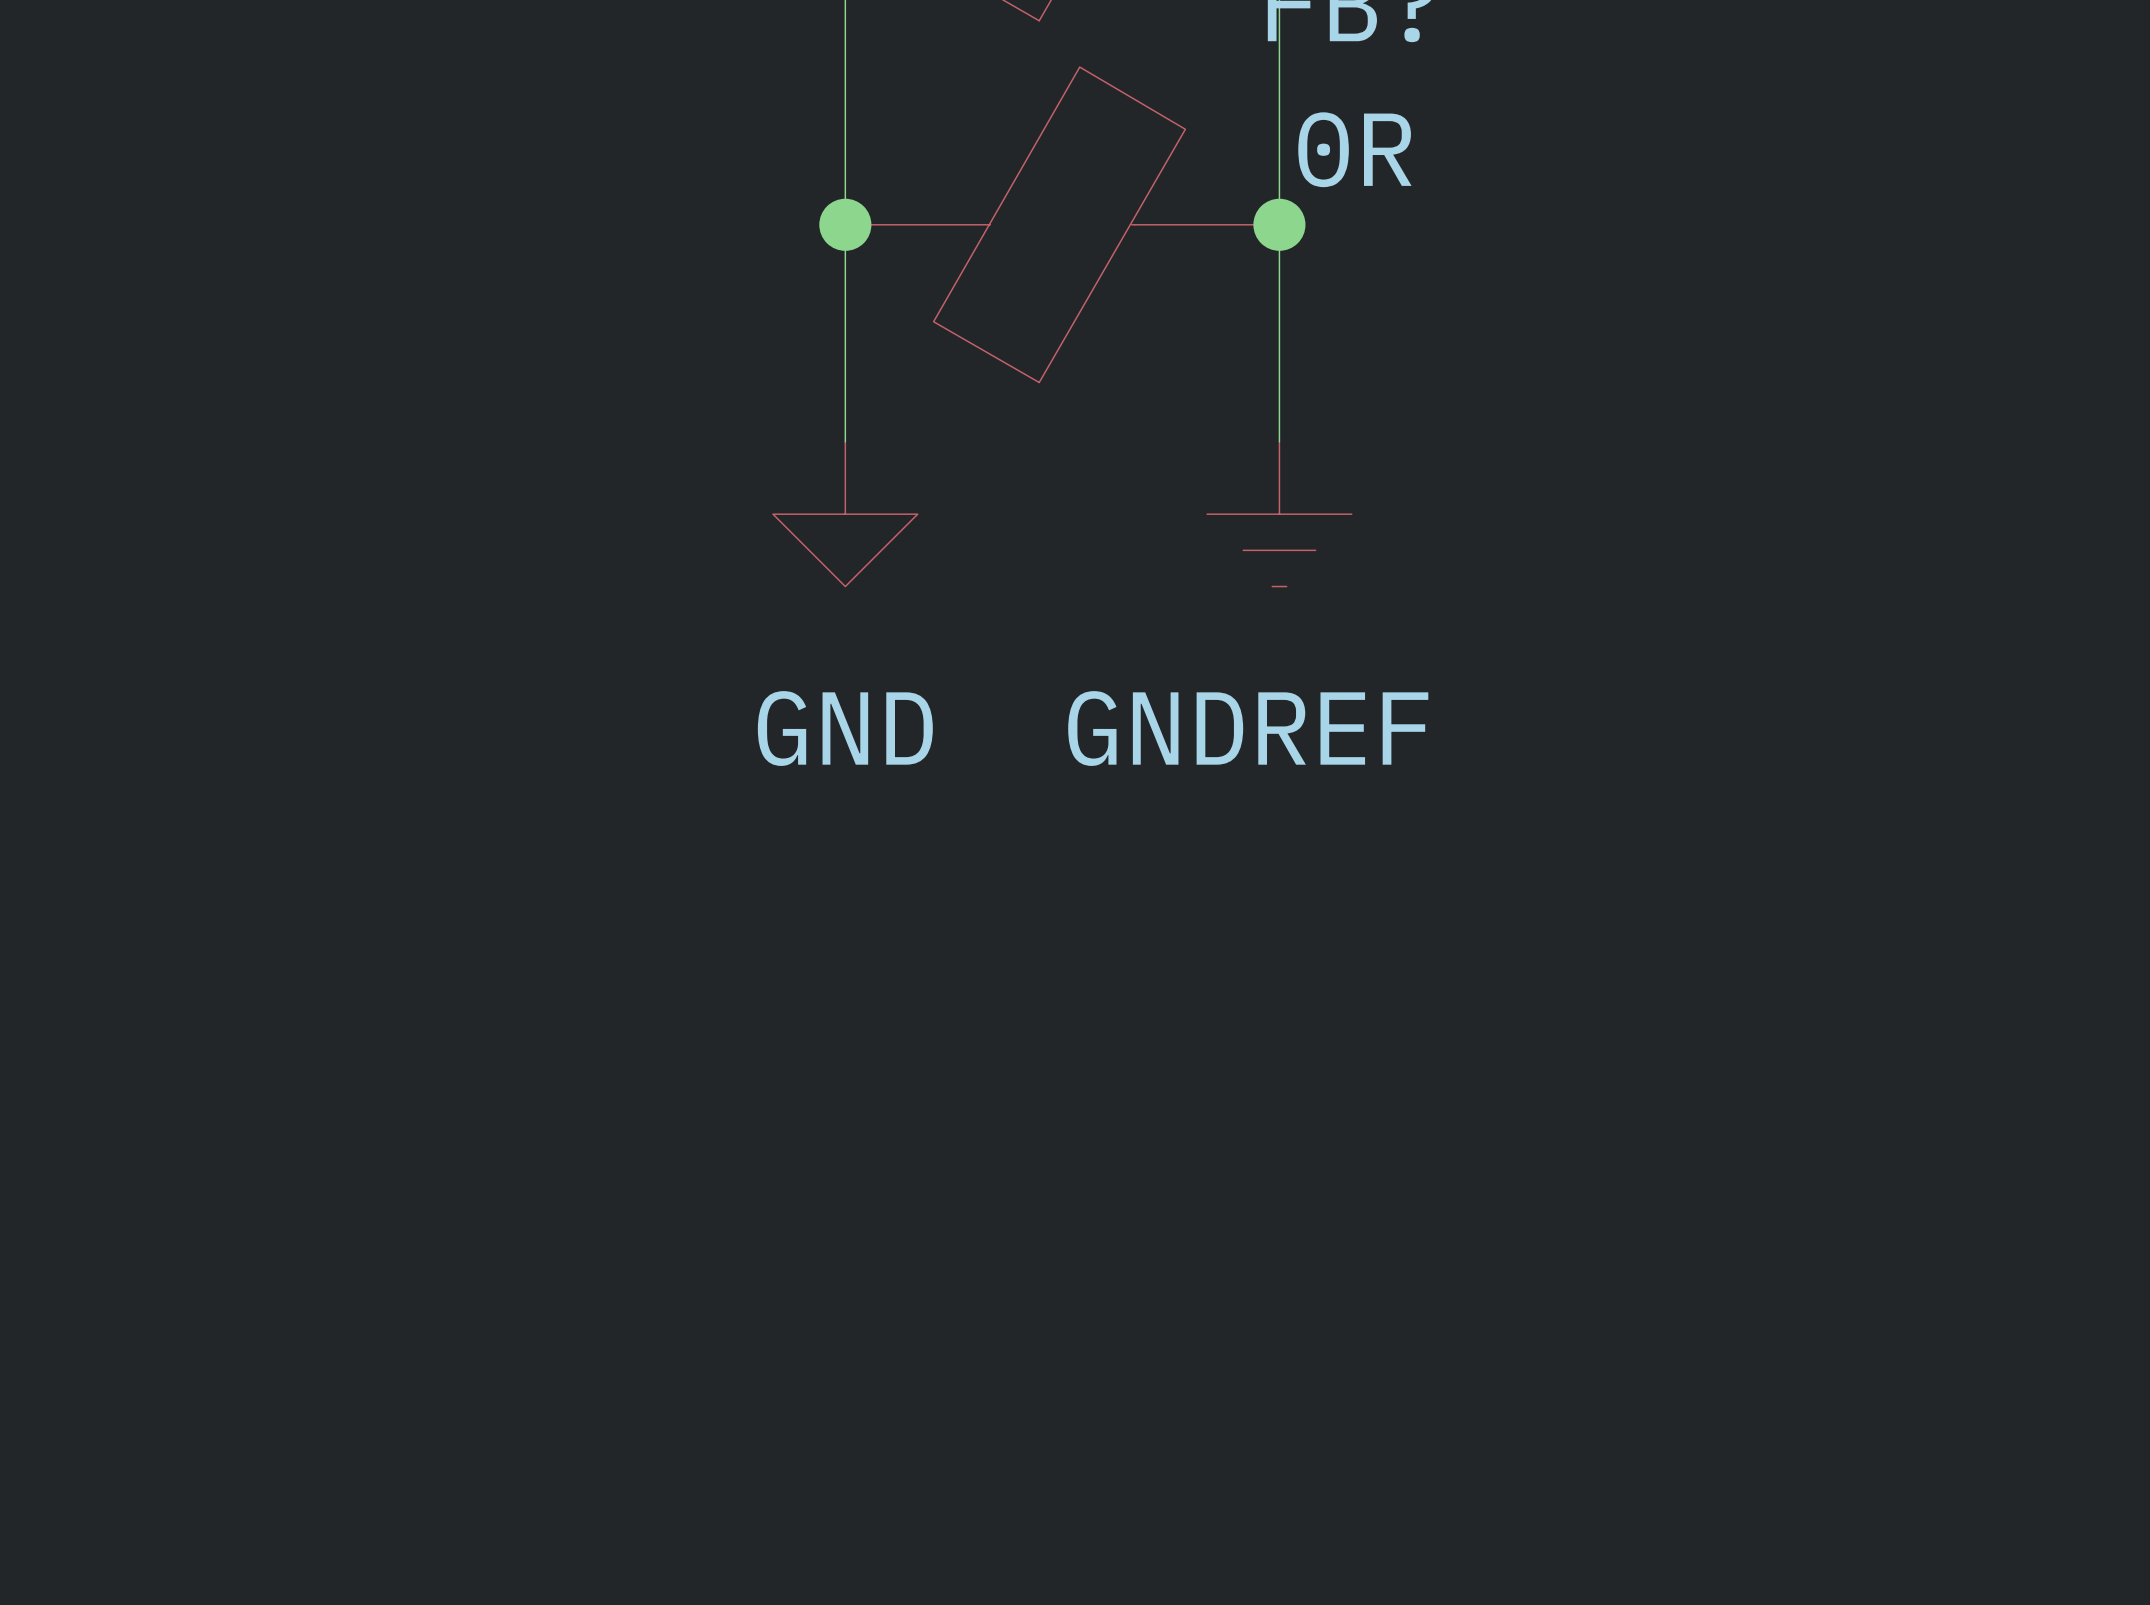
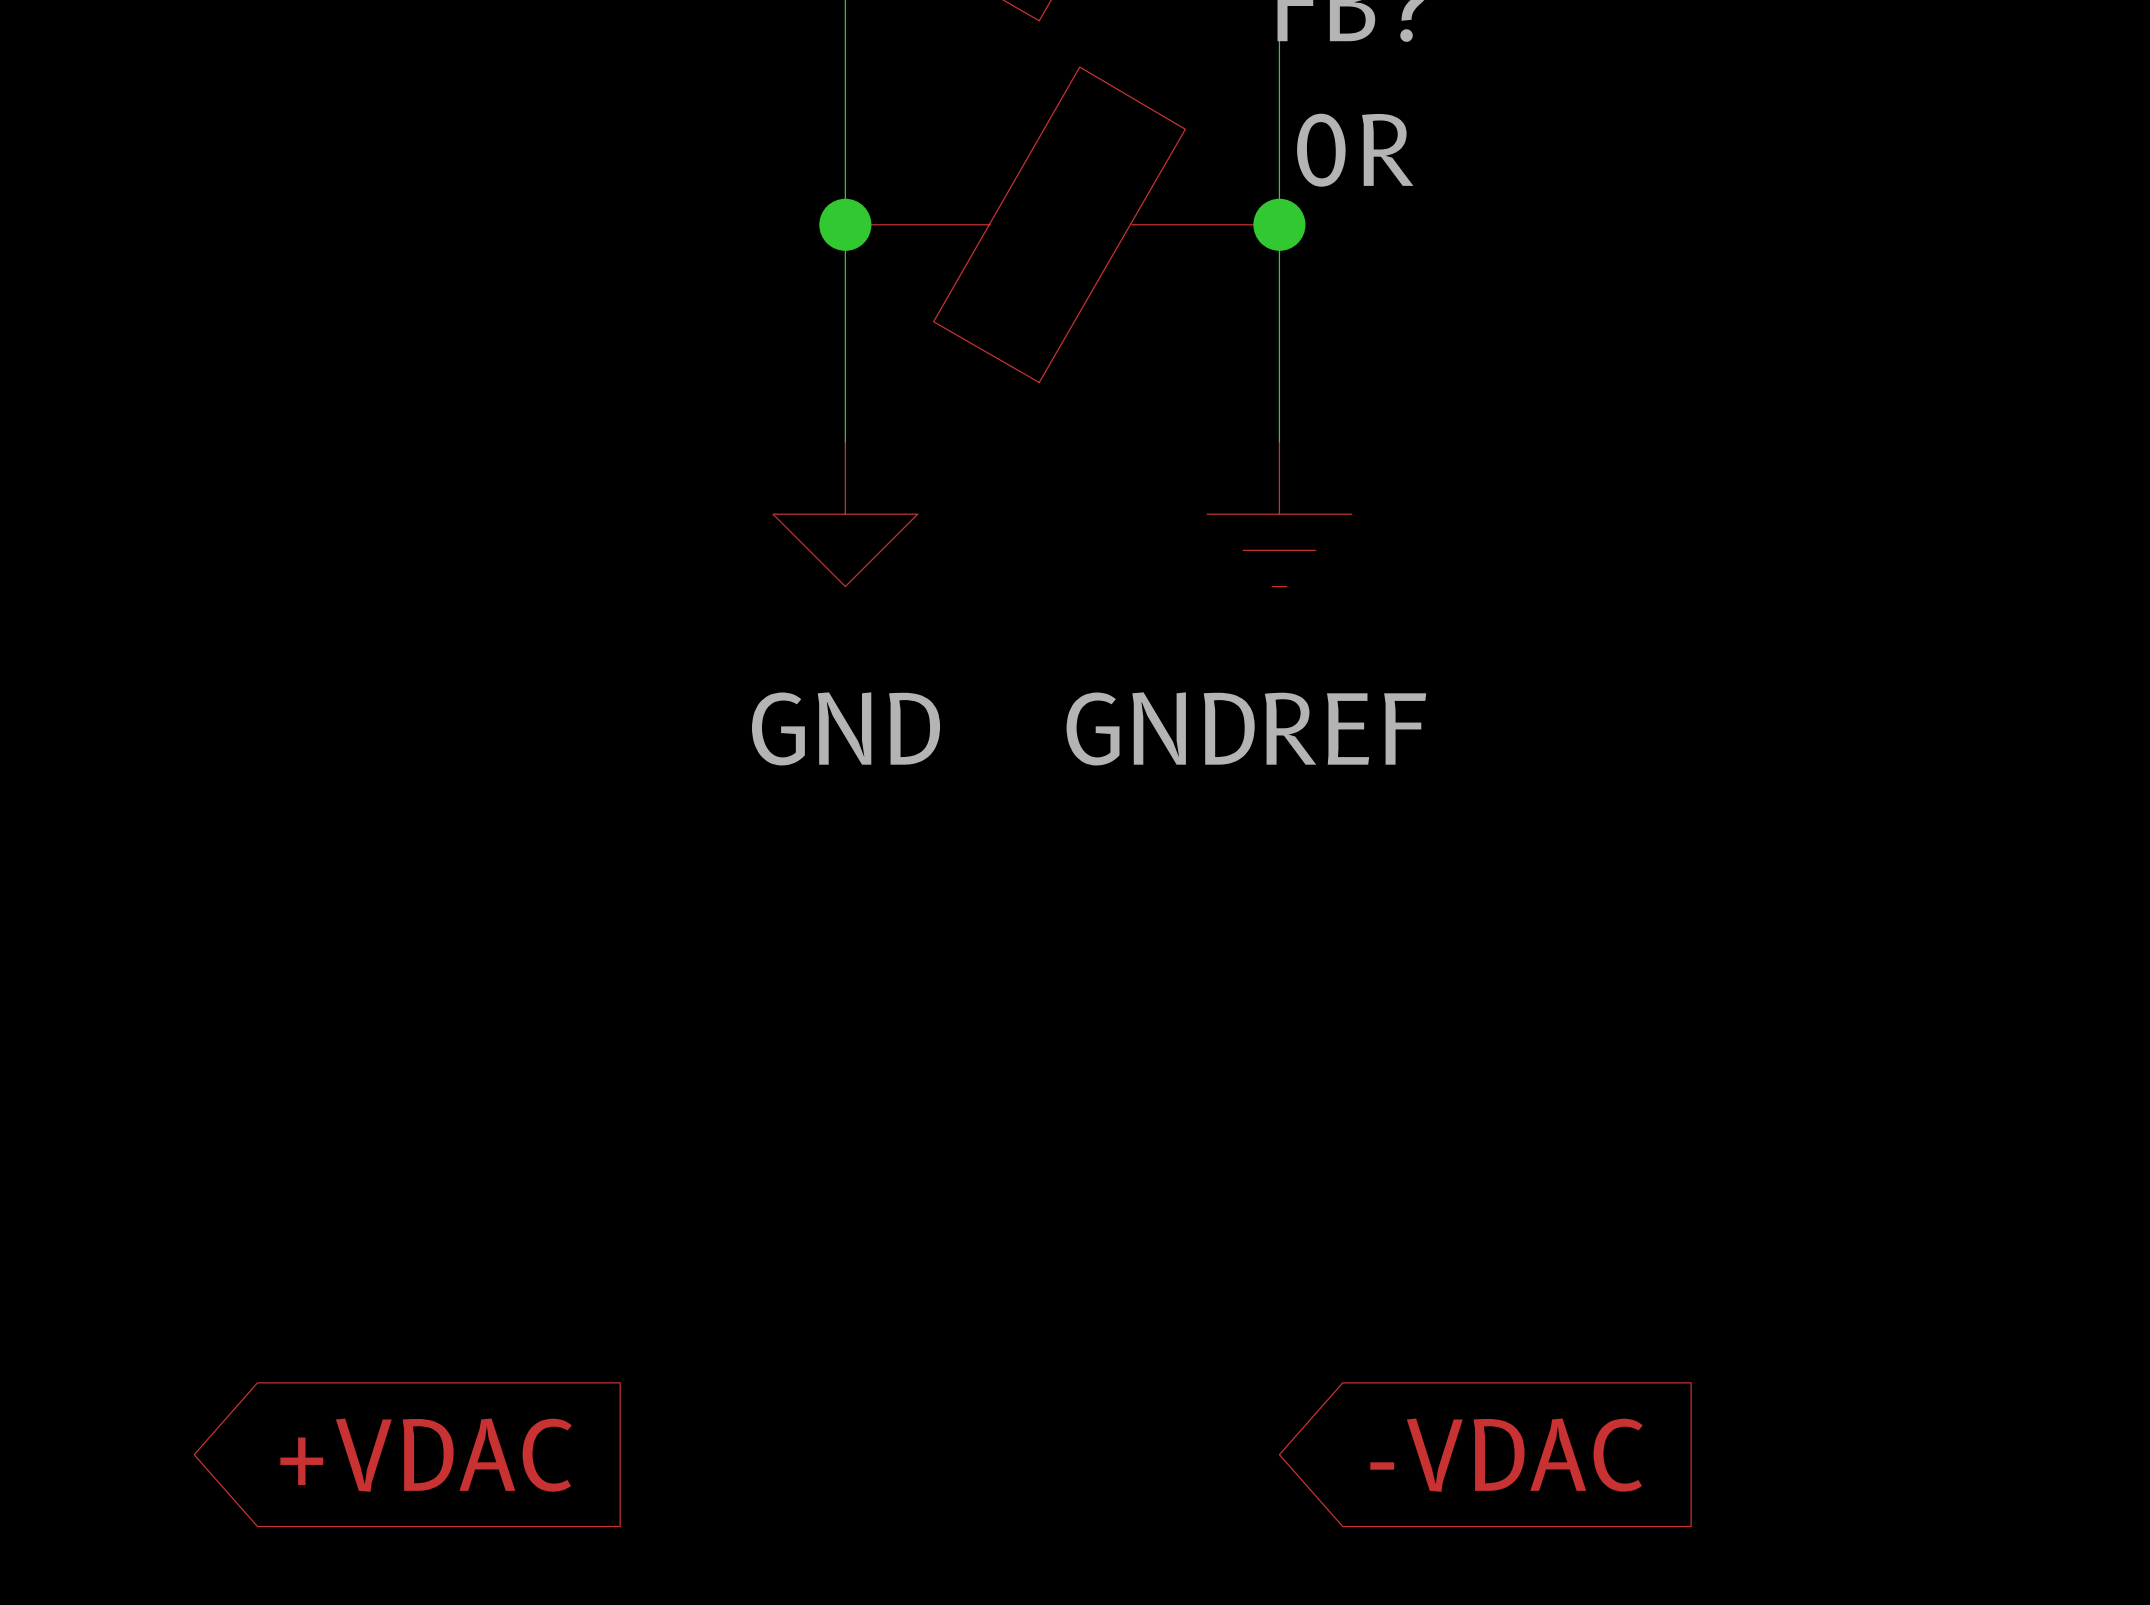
global label: none -> +VDAC (426, 1455)
global label: none -> -VDAC (1506, 1455)

